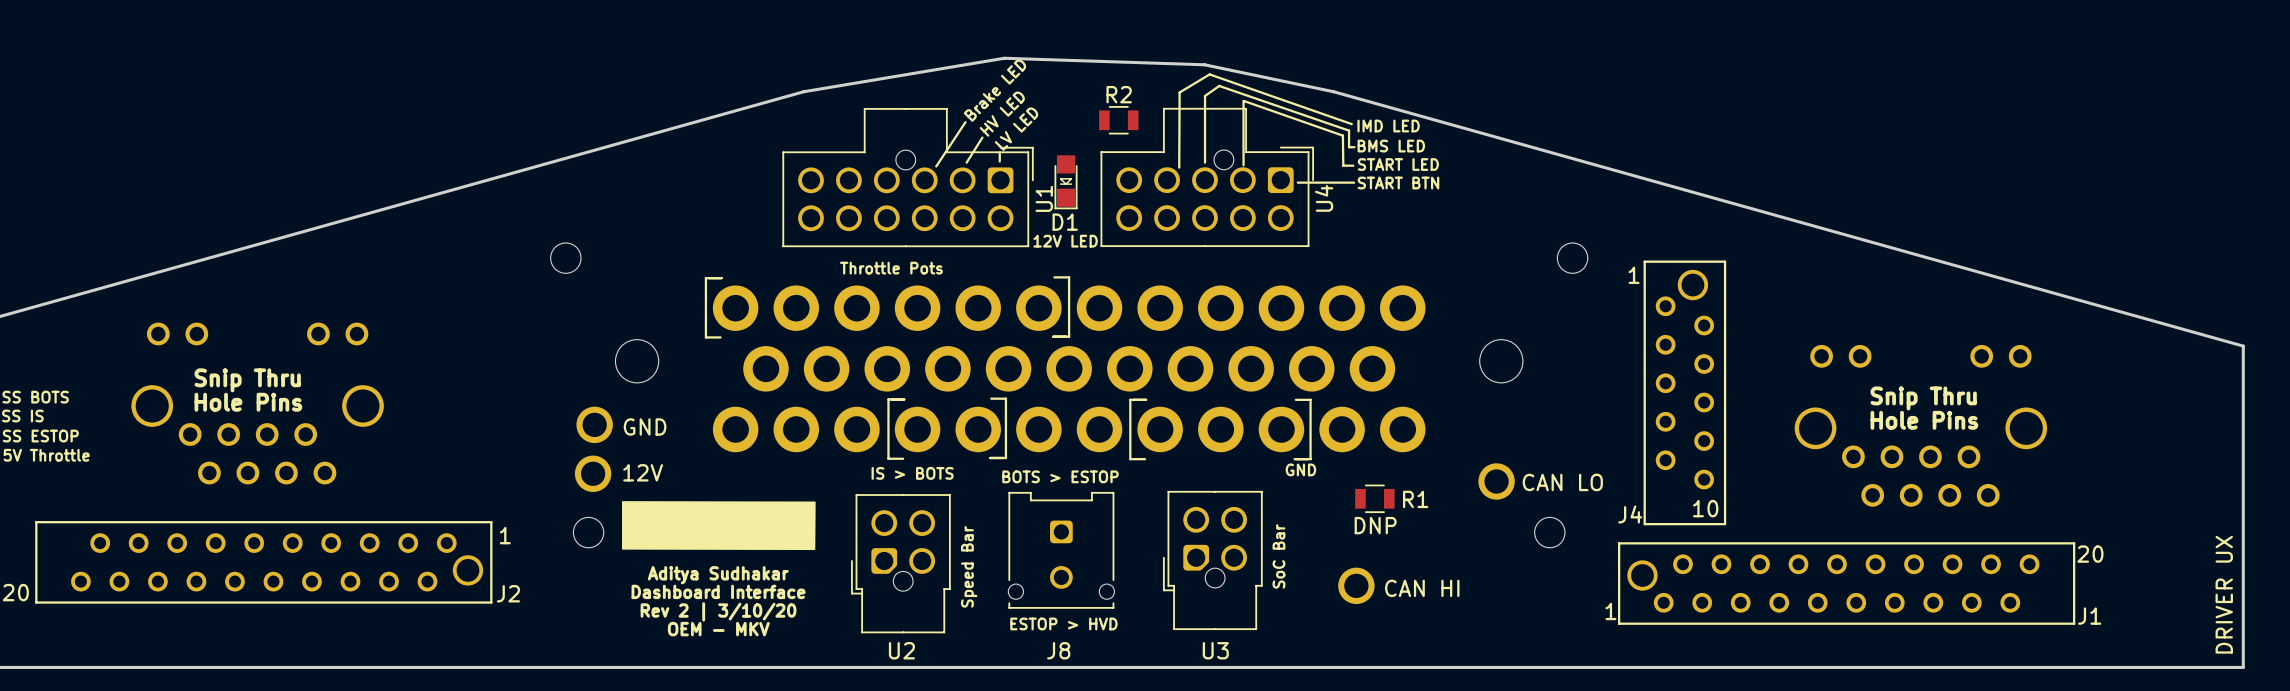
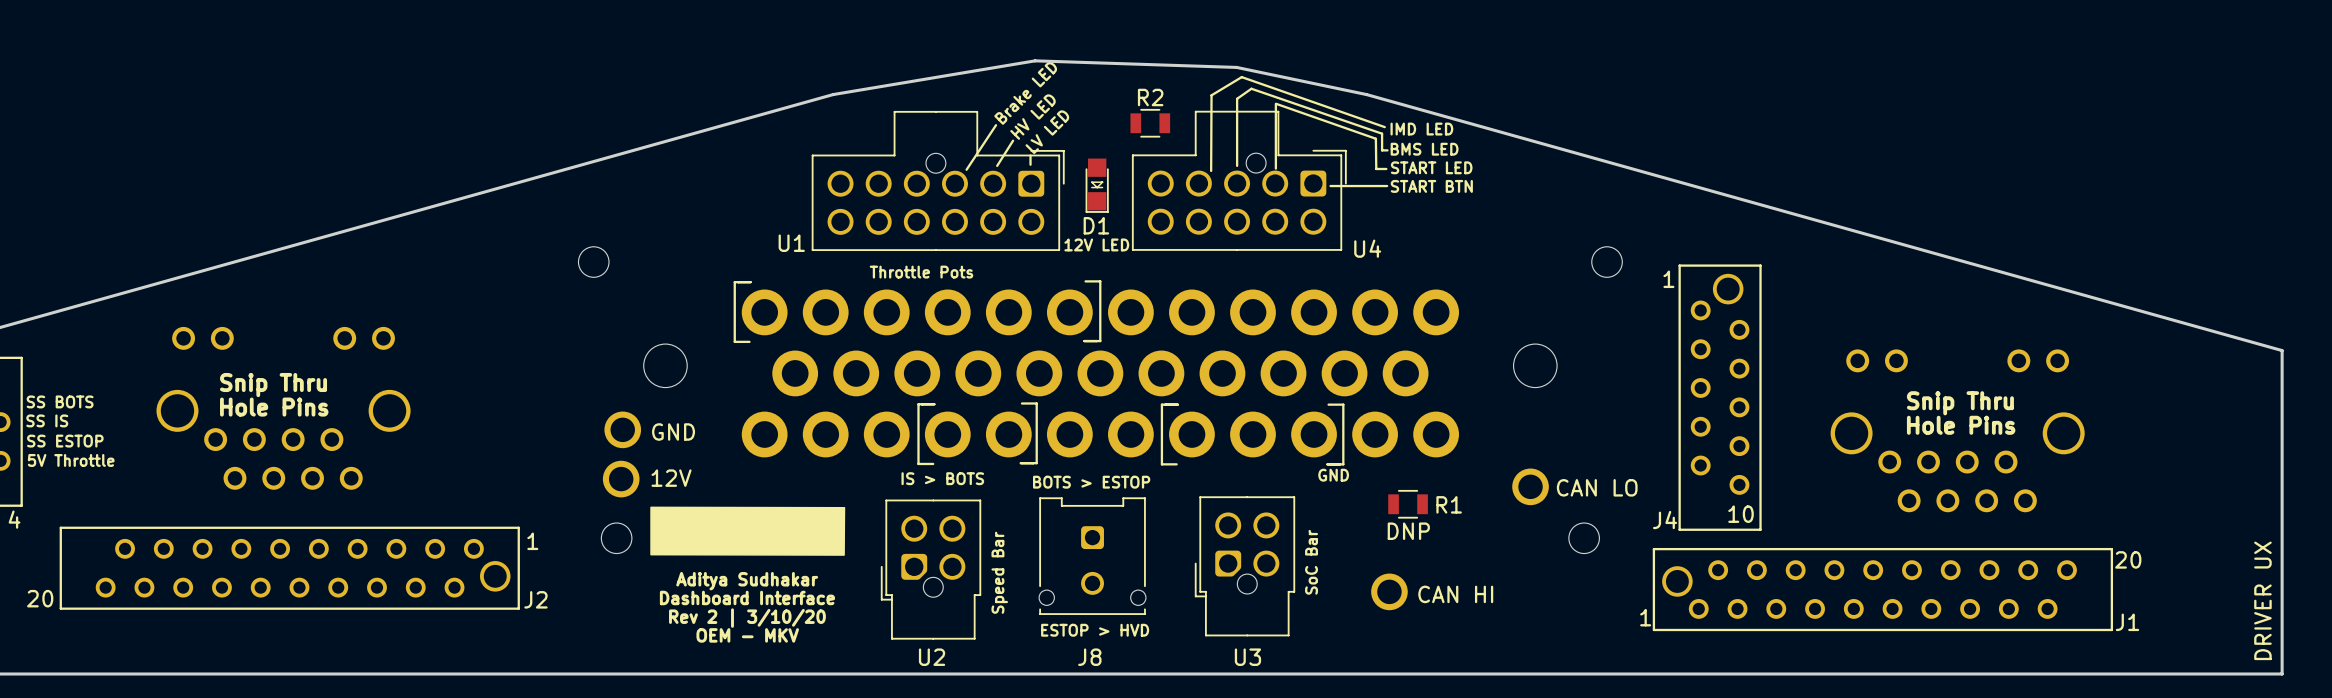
U1 name rotation: 0° (1044, 198) -> 90° clockwise (791, 243)
U1 name position: U1 (1044, 198) -> U1 (791, 243)
U4 name rotation: 0° (1324, 198) -> 90° clockwise (1367, 248)
U4 name position: U4 (1324, 198) -> U4 (1367, 248)

